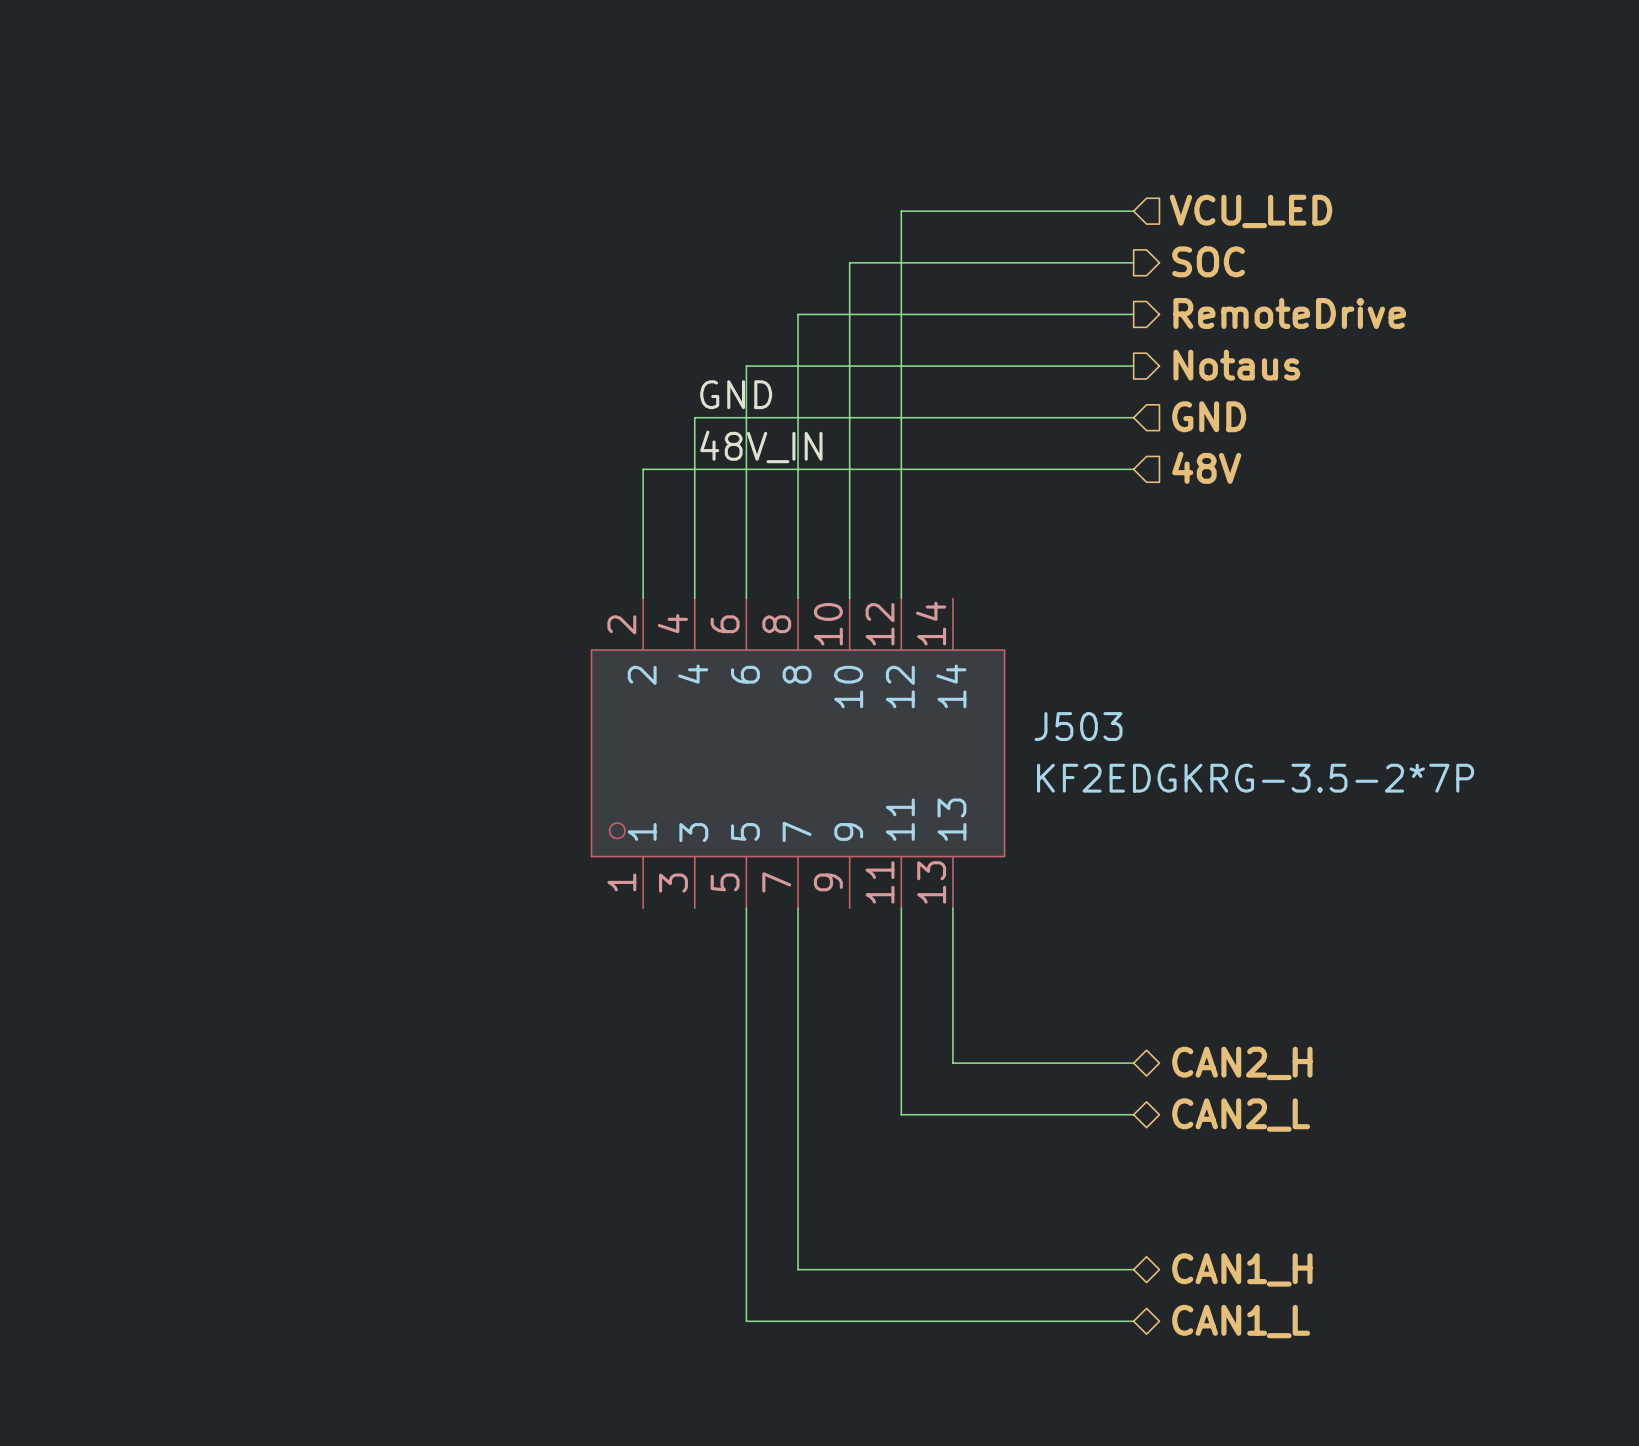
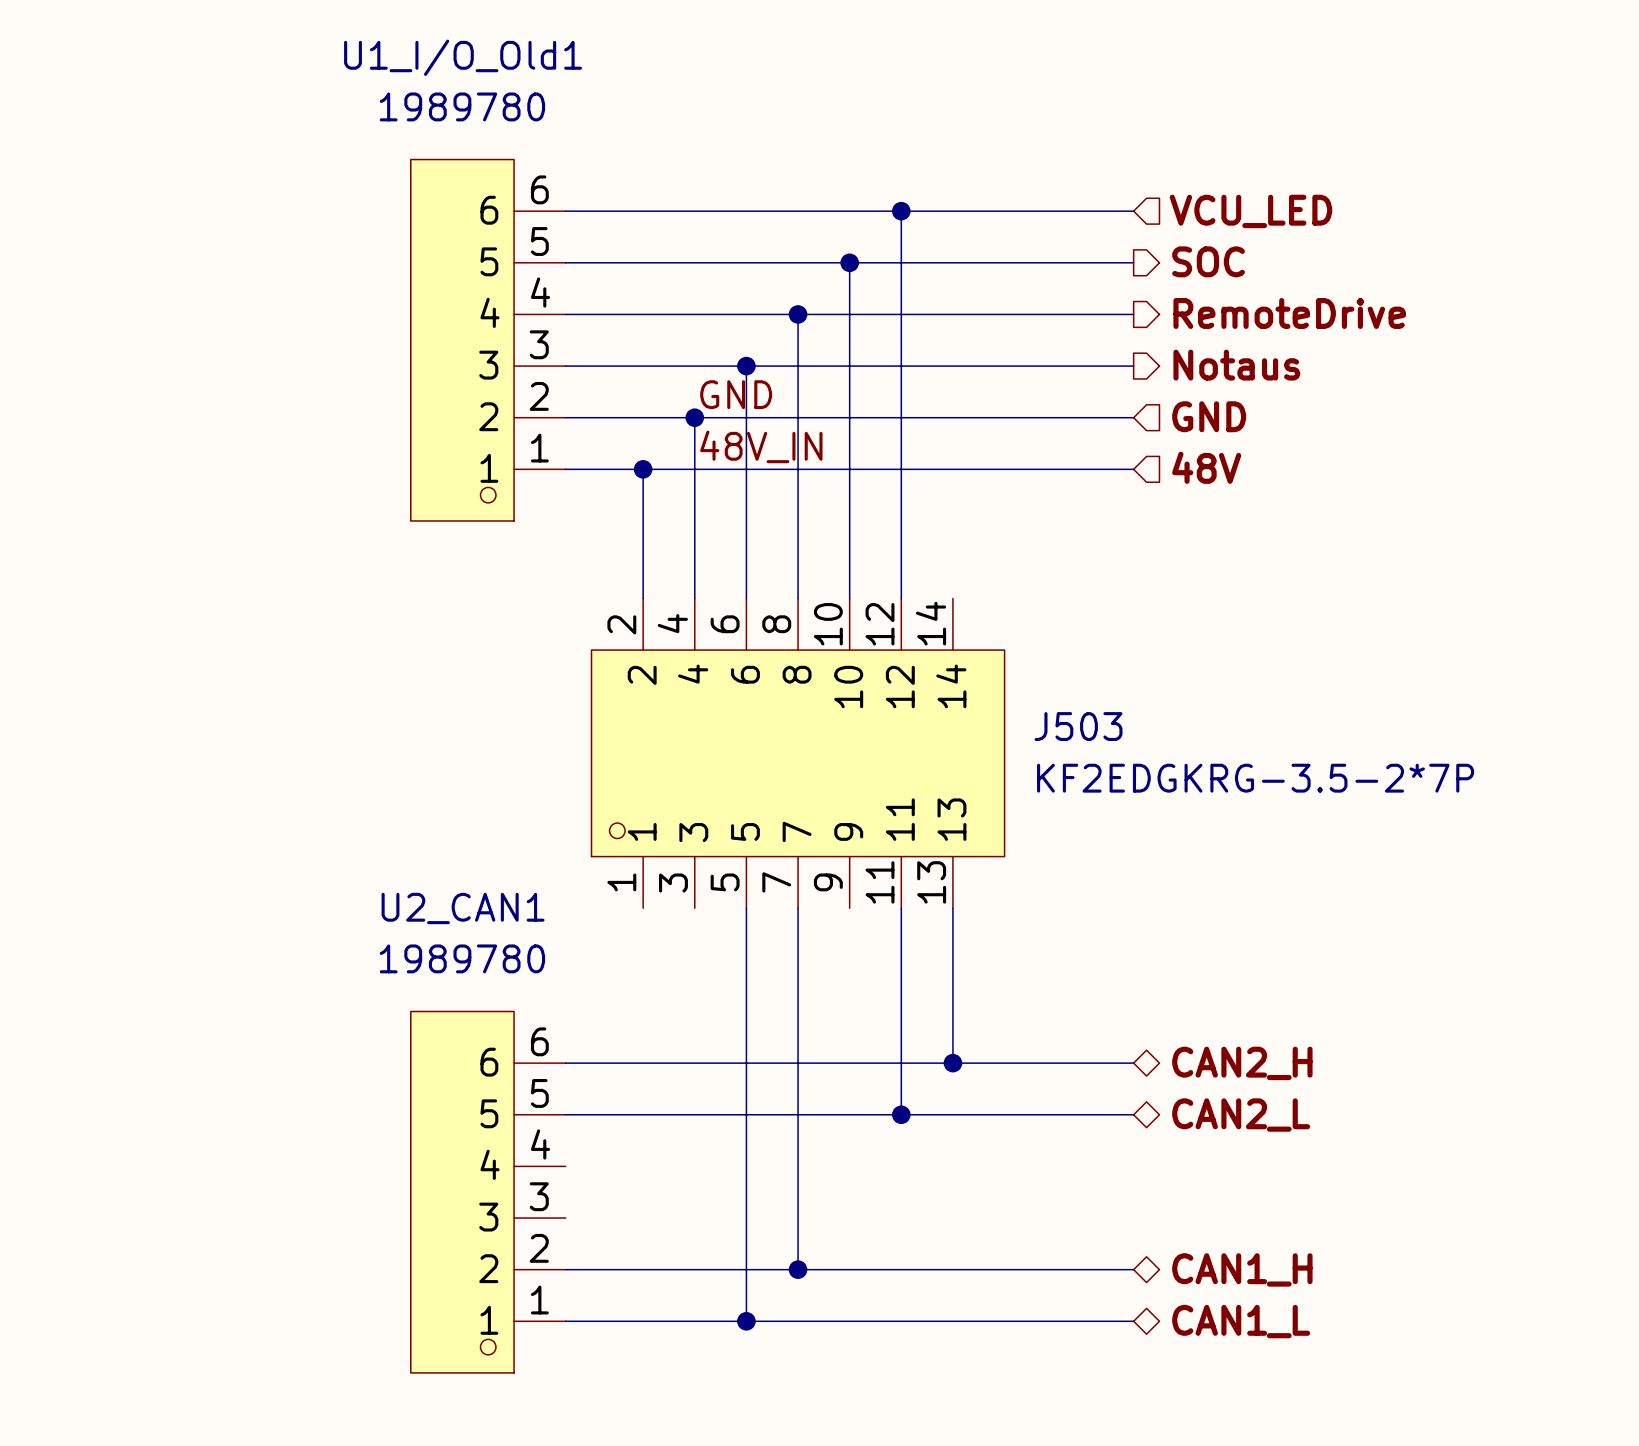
wire: none -> (565, 211) (901, 211)
junction: none -> (901, 211)
wire: none -> (565, 262) (849, 262)
junction: none -> (849, 262)
wire: none -> (565, 314) (798, 314)
junction: none -> (798, 314)
U1_I/O_Old1: none -> 1989780 (488, 340)
wire: none -> (565, 366) (746, 366)
junction: none -> (746, 366)
wire: none -> (565, 417) (694, 417)
junction: none -> (694, 417)
wire: none -> (565, 469) (643, 469)
junction: none -> (643, 469)
wire: none -> (565, 1063) (952, 1063)
junction: none -> (952, 1063)
wire: none -> (565, 1114) (901, 1114)
junction: none -> (901, 1114)
U2_CAN1: none -> 1989780 (488, 1192)
wire: none -> (565, 1269) (798, 1269)
junction: none -> (798, 1269)
wire: none -> (565, 1321) (746, 1321)
junction: none -> (746, 1321)

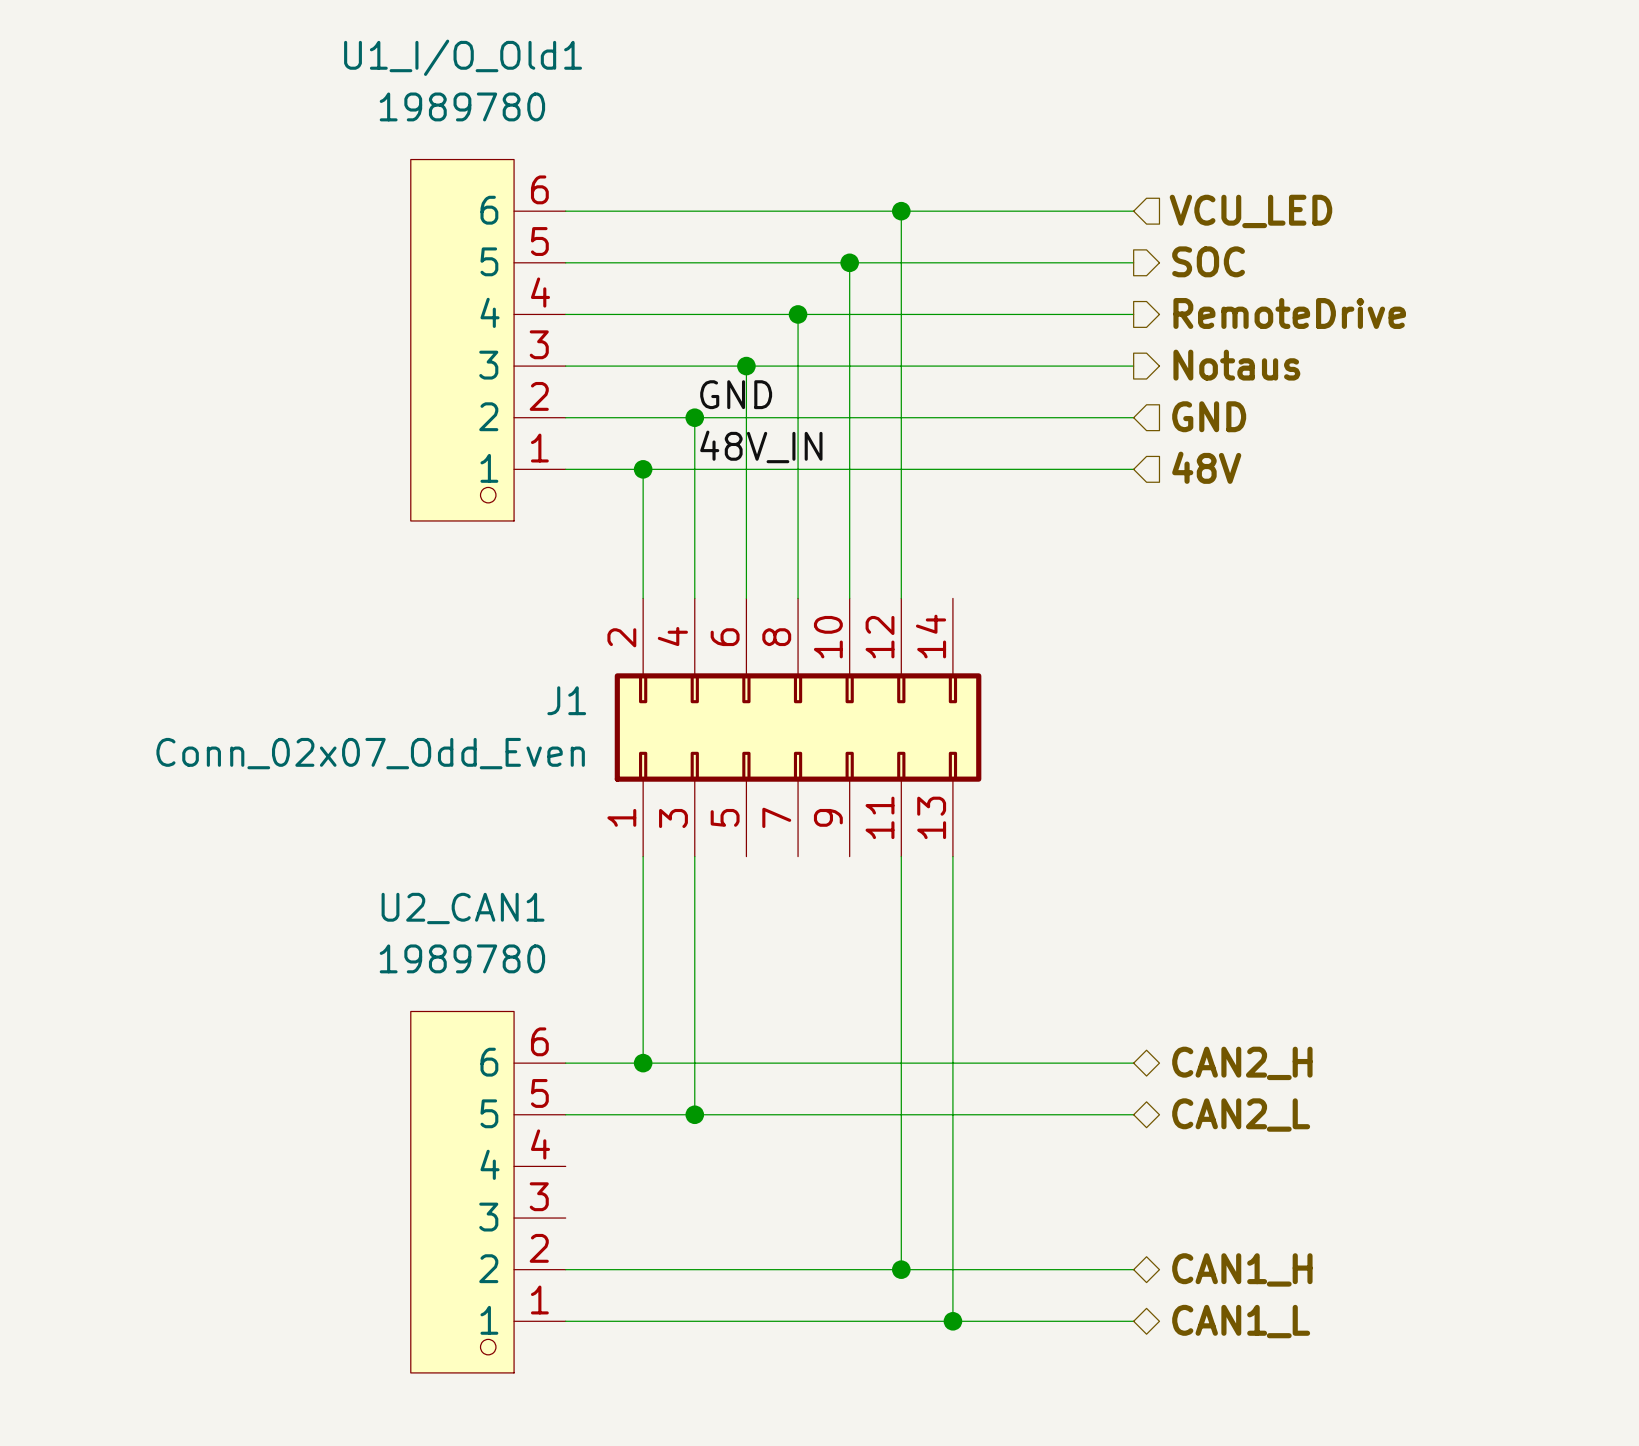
J1: none -> Conn_02x07_Odd_Even (798, 727)
J503: KF2EDGKRG-3.5-2*7P (798, 753) -> none
wire: none -> (643, 856) (643, 1063)
wire: none -> (694, 856) (694, 1114)
wire: (746, 908) (746, 1321) -> none
wire: (798, 908) (798, 1269) -> none
junction: none -> (643, 1063)
wire: none -> (952, 1063) (952, 1321)
junction: (952, 1063) -> none
junction: none -> (694, 1114)
wire: none -> (901, 1114) (901, 1269)
junction: (901, 1114) -> none
junction: (798, 1269) -> none
junction: none -> (901, 1269)
junction: (746, 1321) -> none
junction: none -> (952, 1321)

